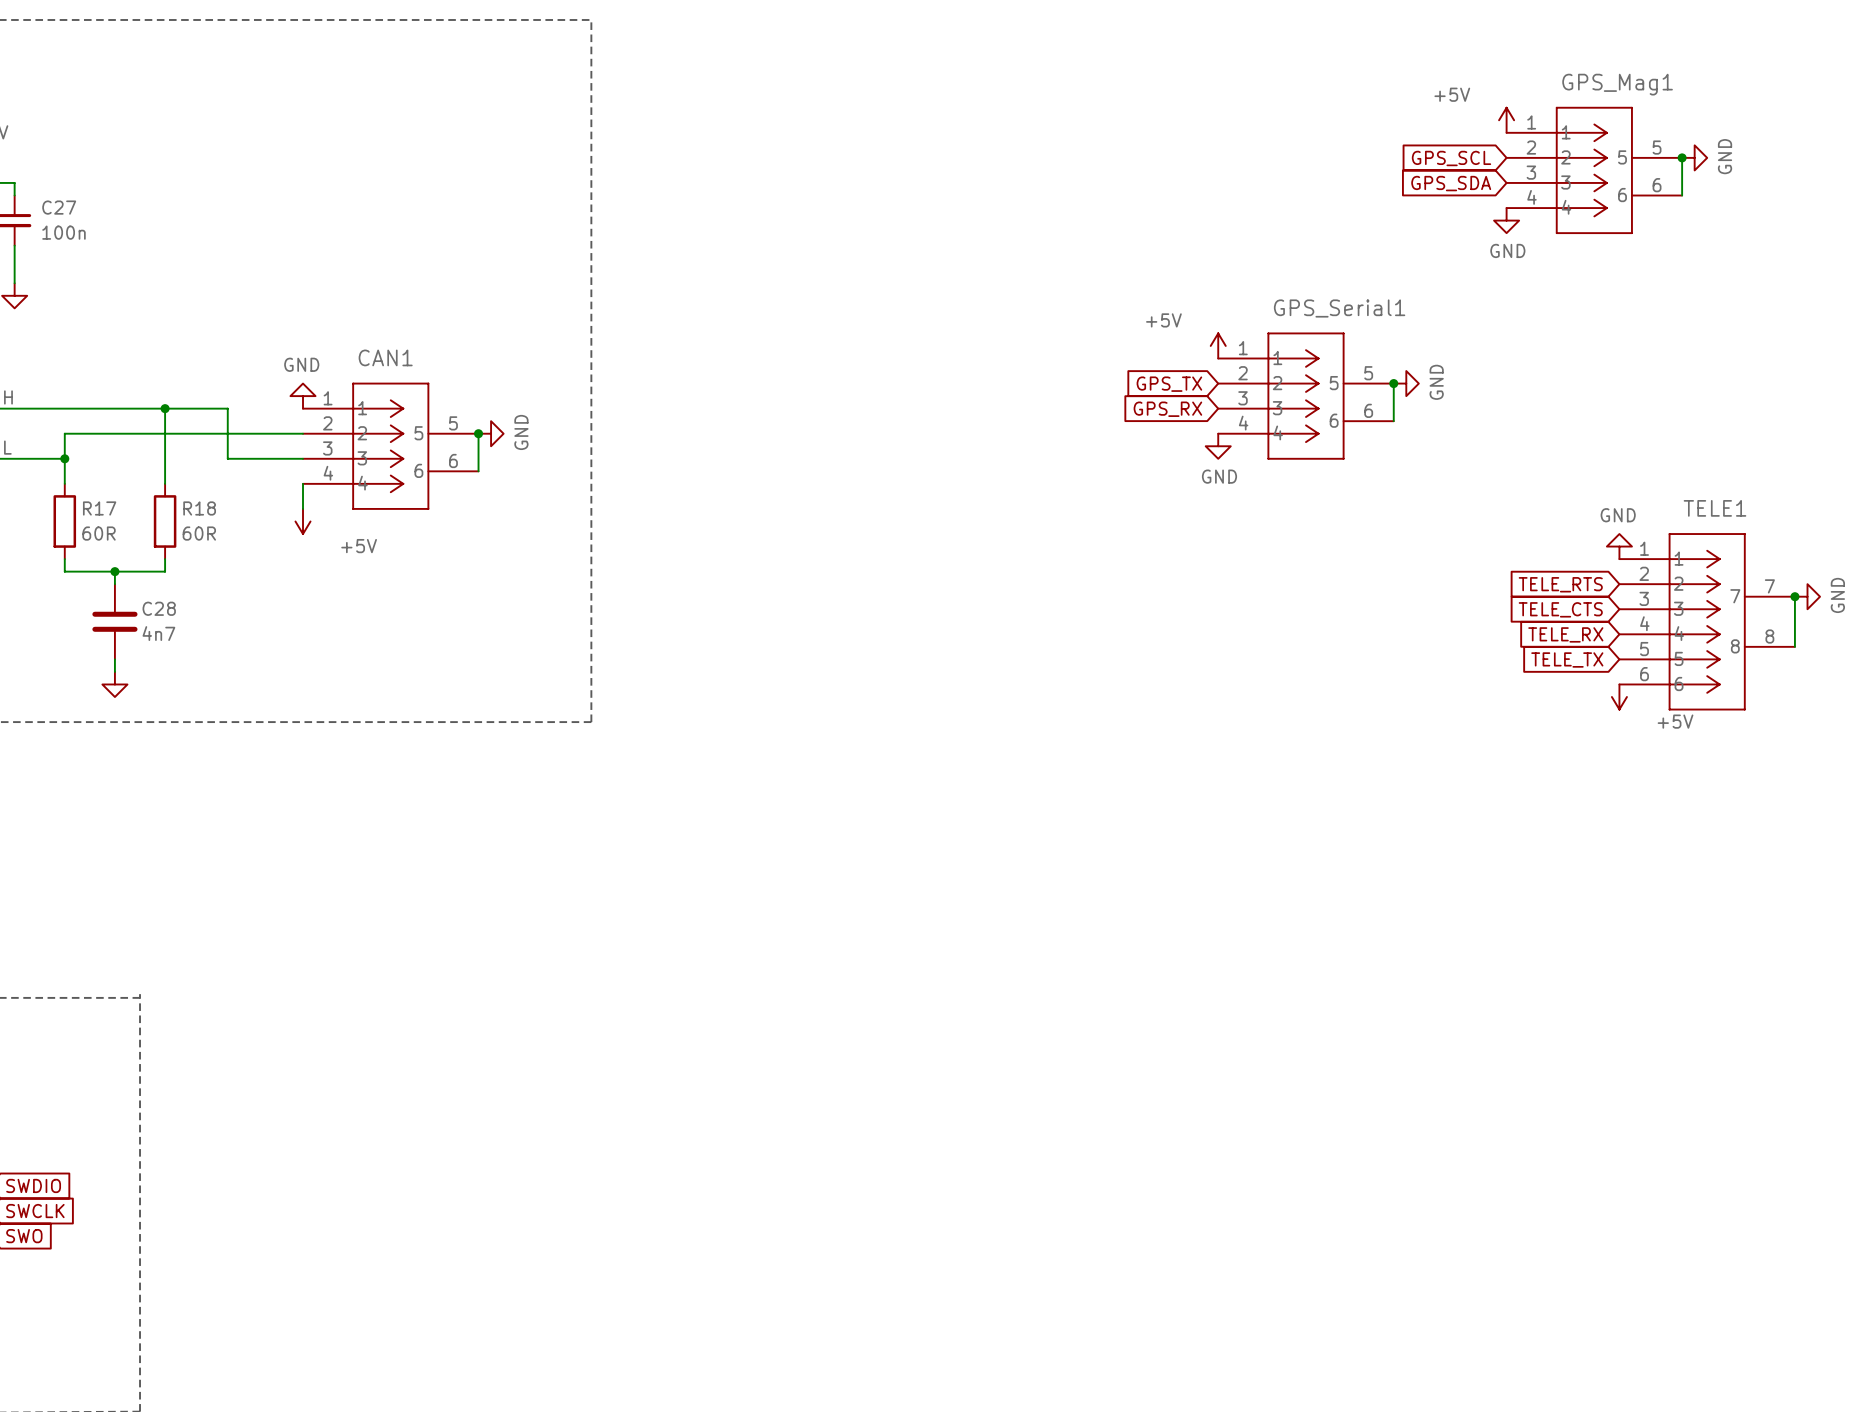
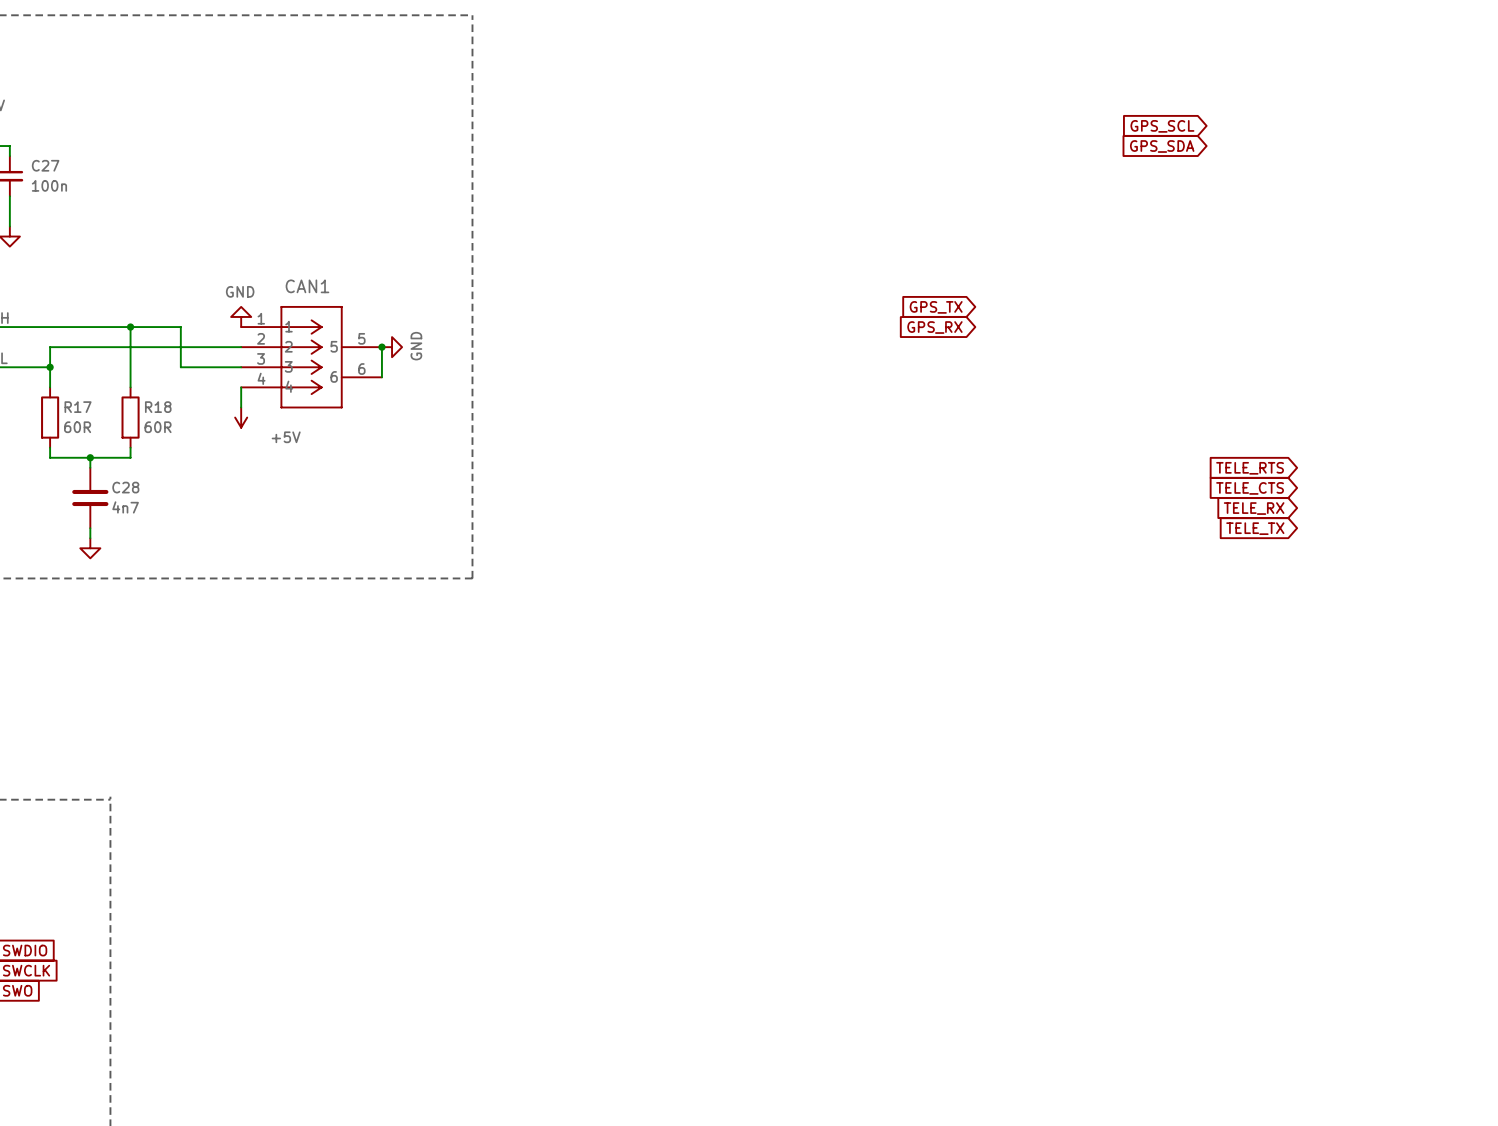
power symbol: +5V (1506, 120) -> none
wire: (1682, 157) (1682, 195) -> none
junction: (1682, 157) -> none
power symbol: GND (1694, 157) -> none
GPS_Mag1: (1594, 170) -> none
power symbol: GND (1506, 220) -> none
power symbol: +5V (1218, 345) -> none
wire: (1393, 383) (1393, 421) -> none
junction: (1393, 383) -> none
power symbol: GND (1406, 383) -> none
GPS_Serial1: (1305, 396) -> none
power symbol: GND (1218, 446) -> none
power symbol: GND (1619, 546) -> none
wire: (1794, 596) (1794, 646) -> none
junction: (1794, 596) -> none
power symbol: GND (1807, 596) -> none
TELE1: (1707, 621) -> none
power symbol: +5V (1619, 697) -> none

